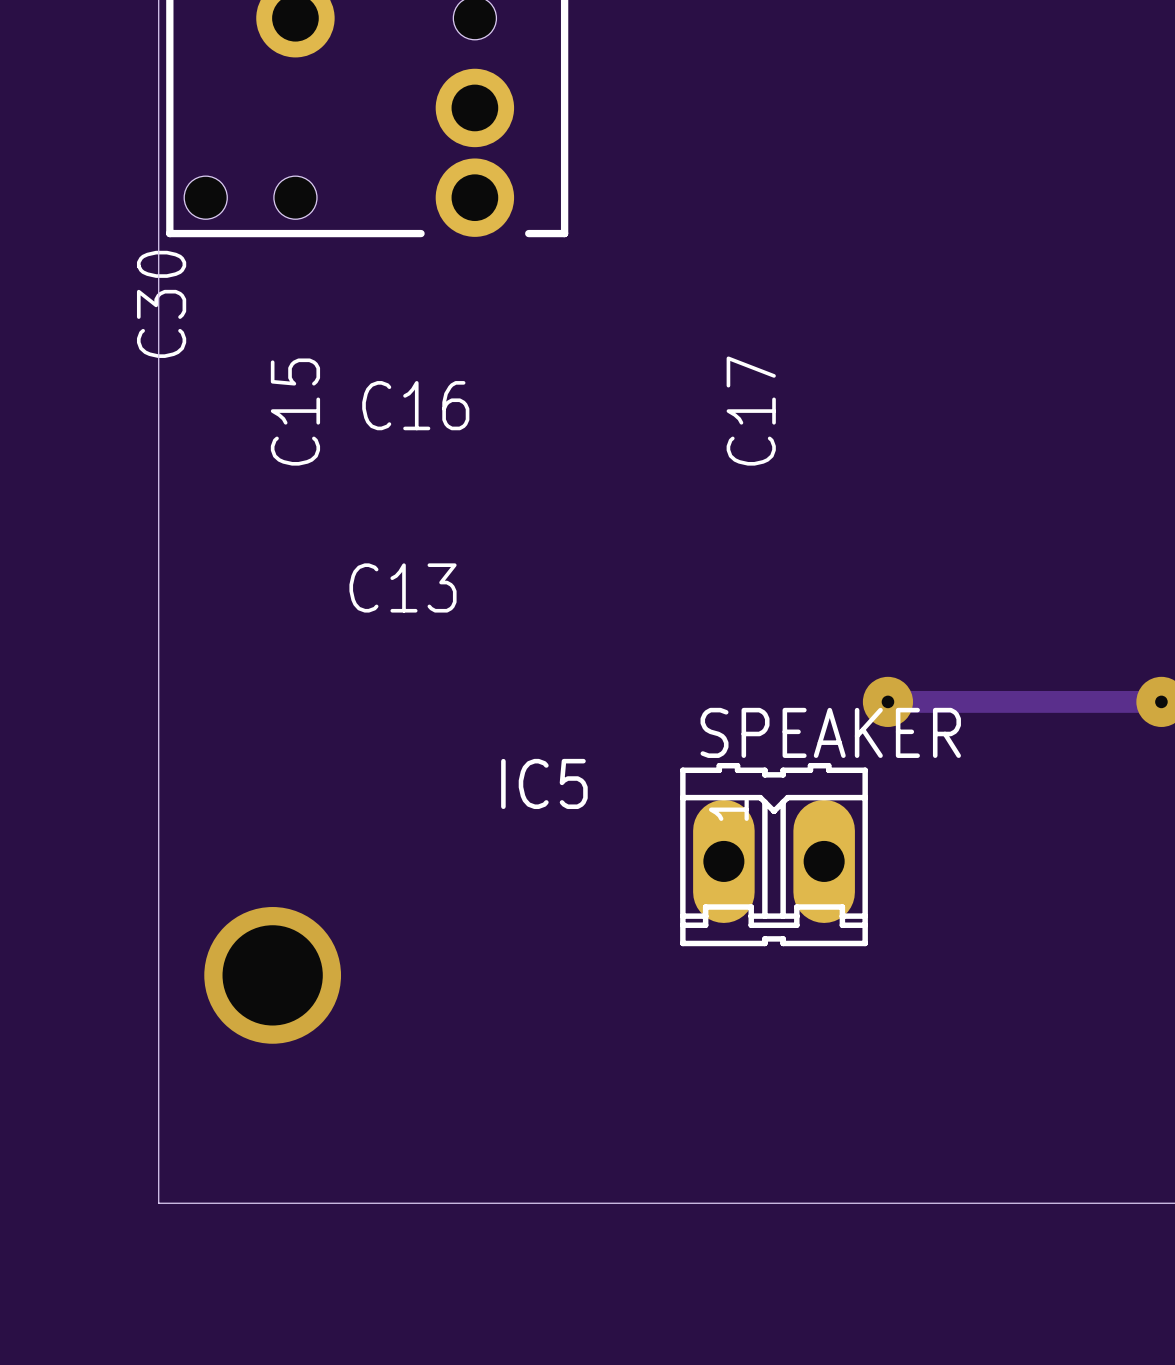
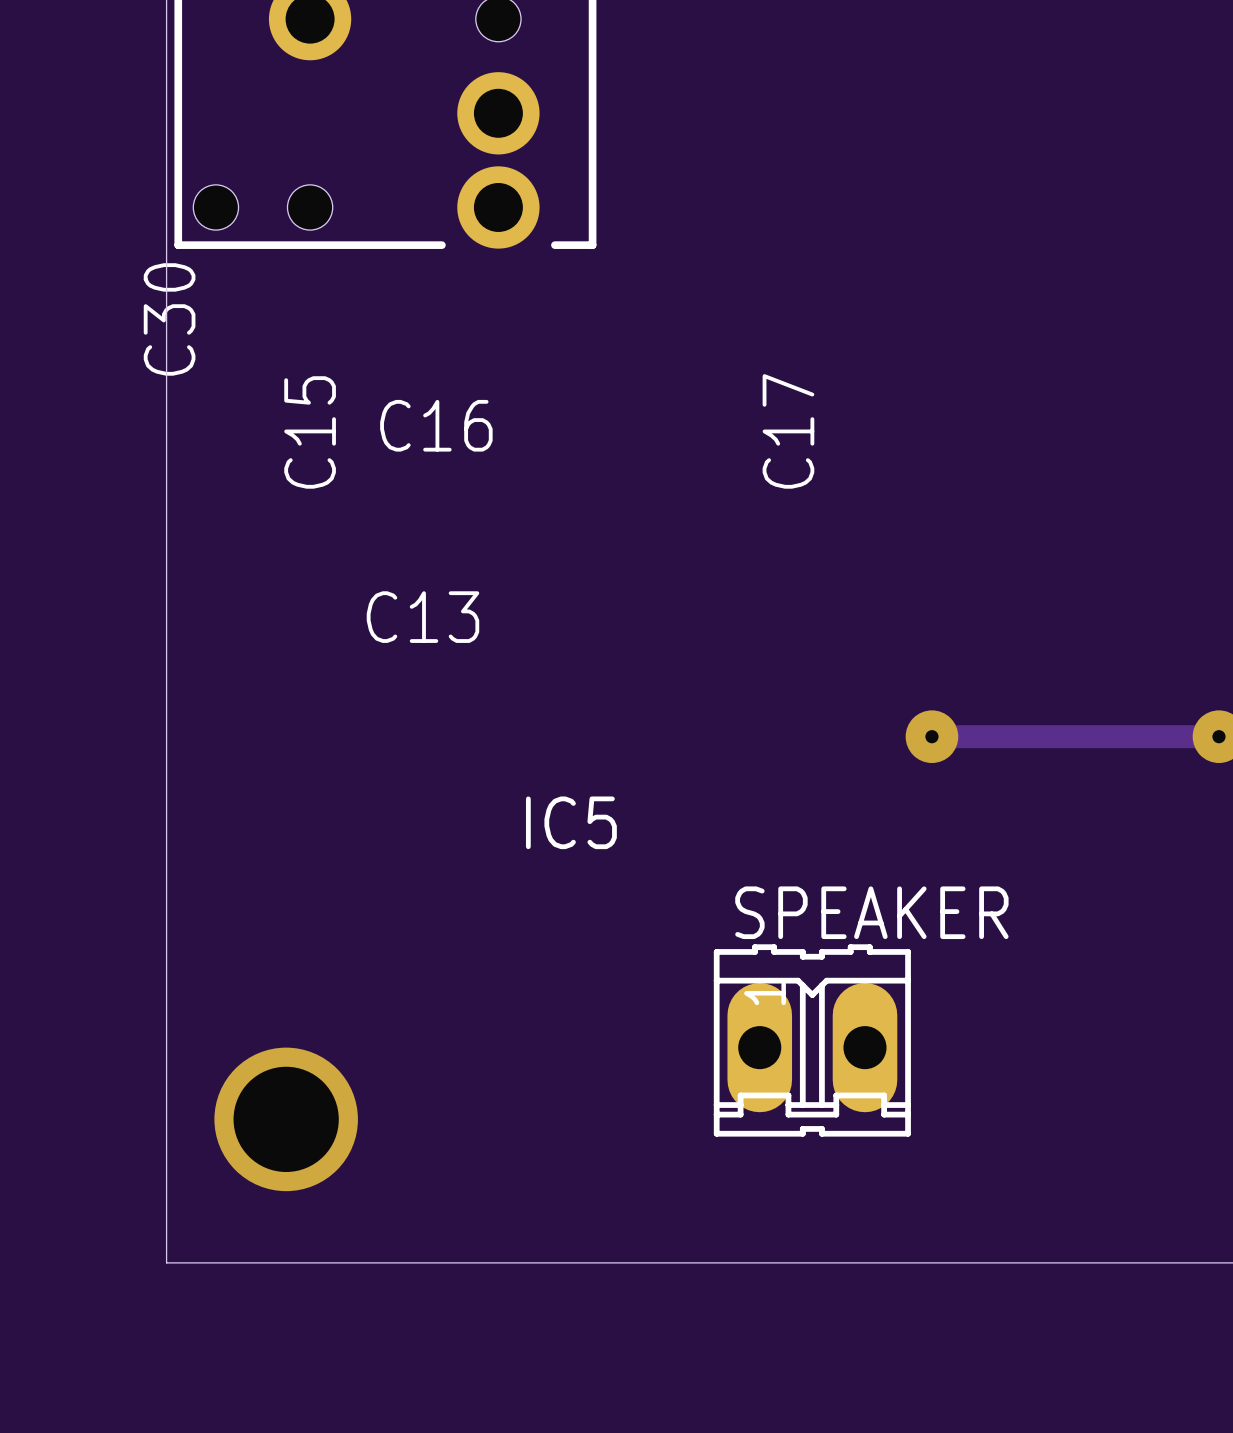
SPEAKER position: (774, 854) -> (812, 1040)
via position: (272, 975) -> (286, 1119)

